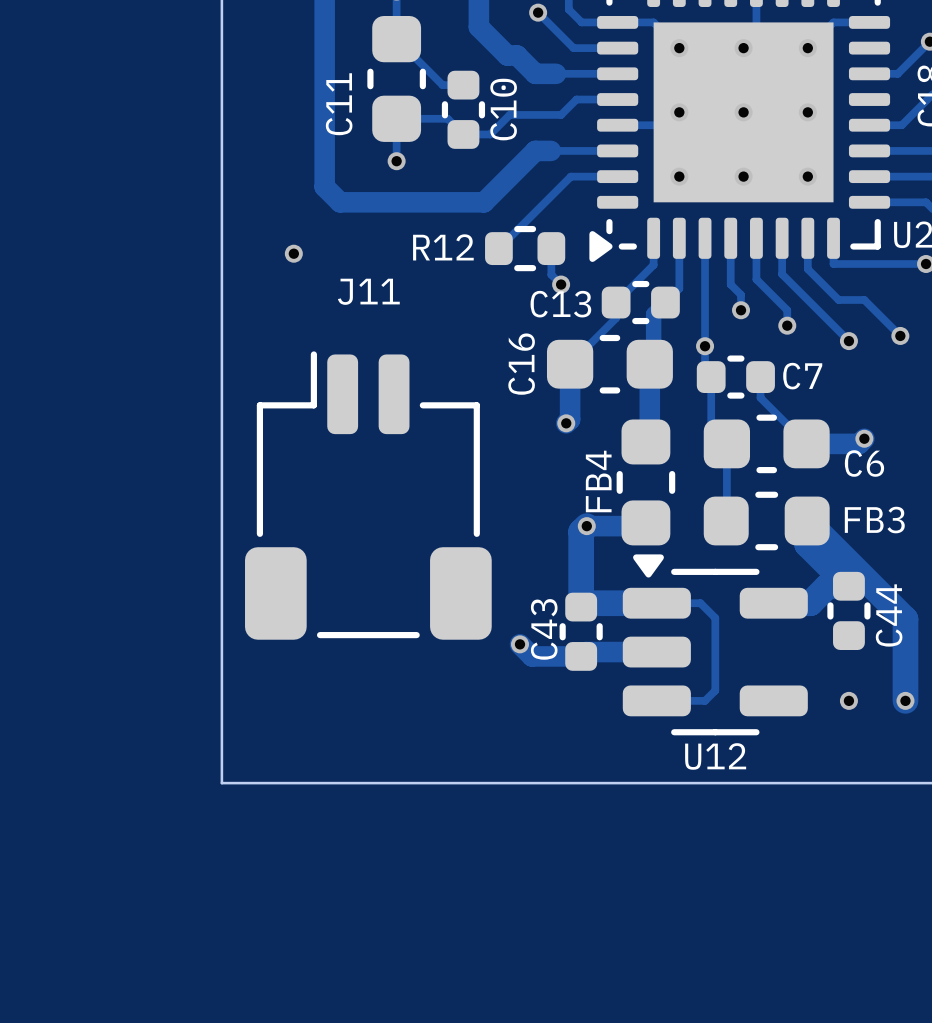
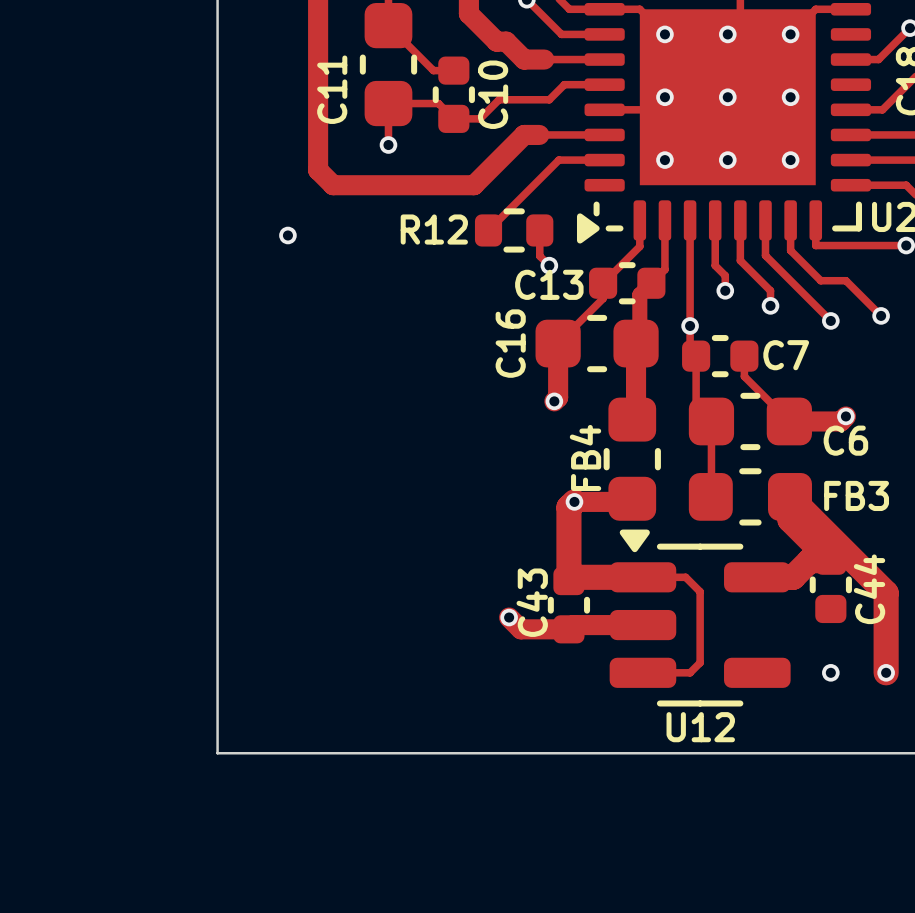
J11: (368, 495) -> none

